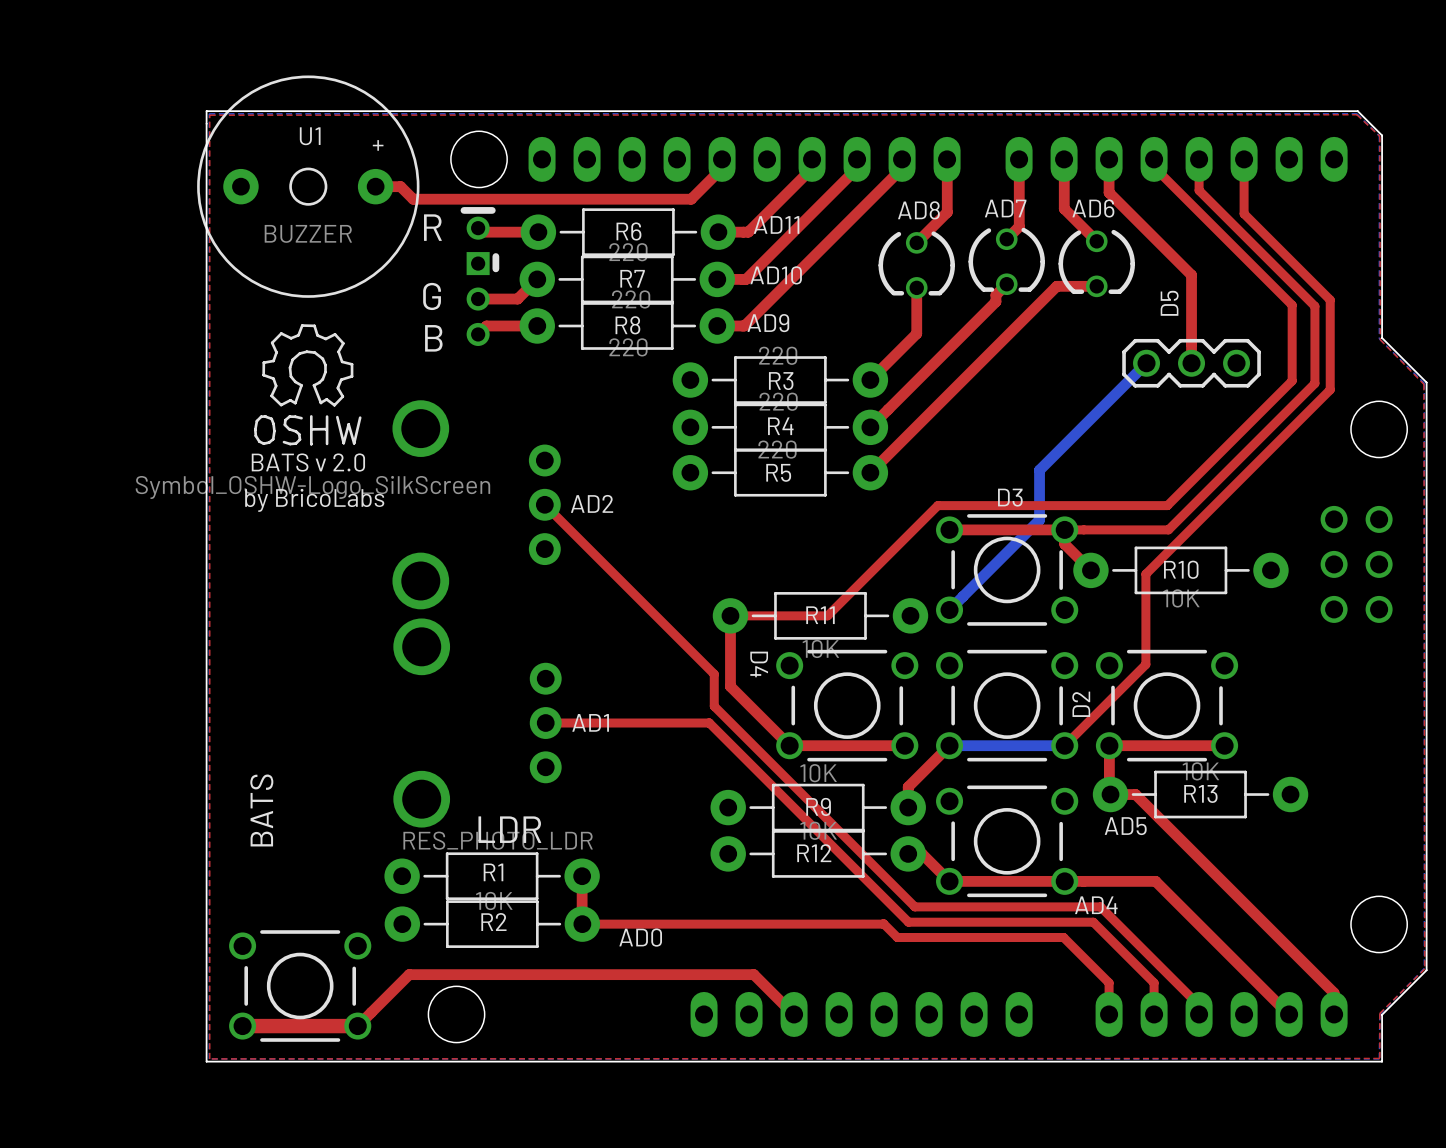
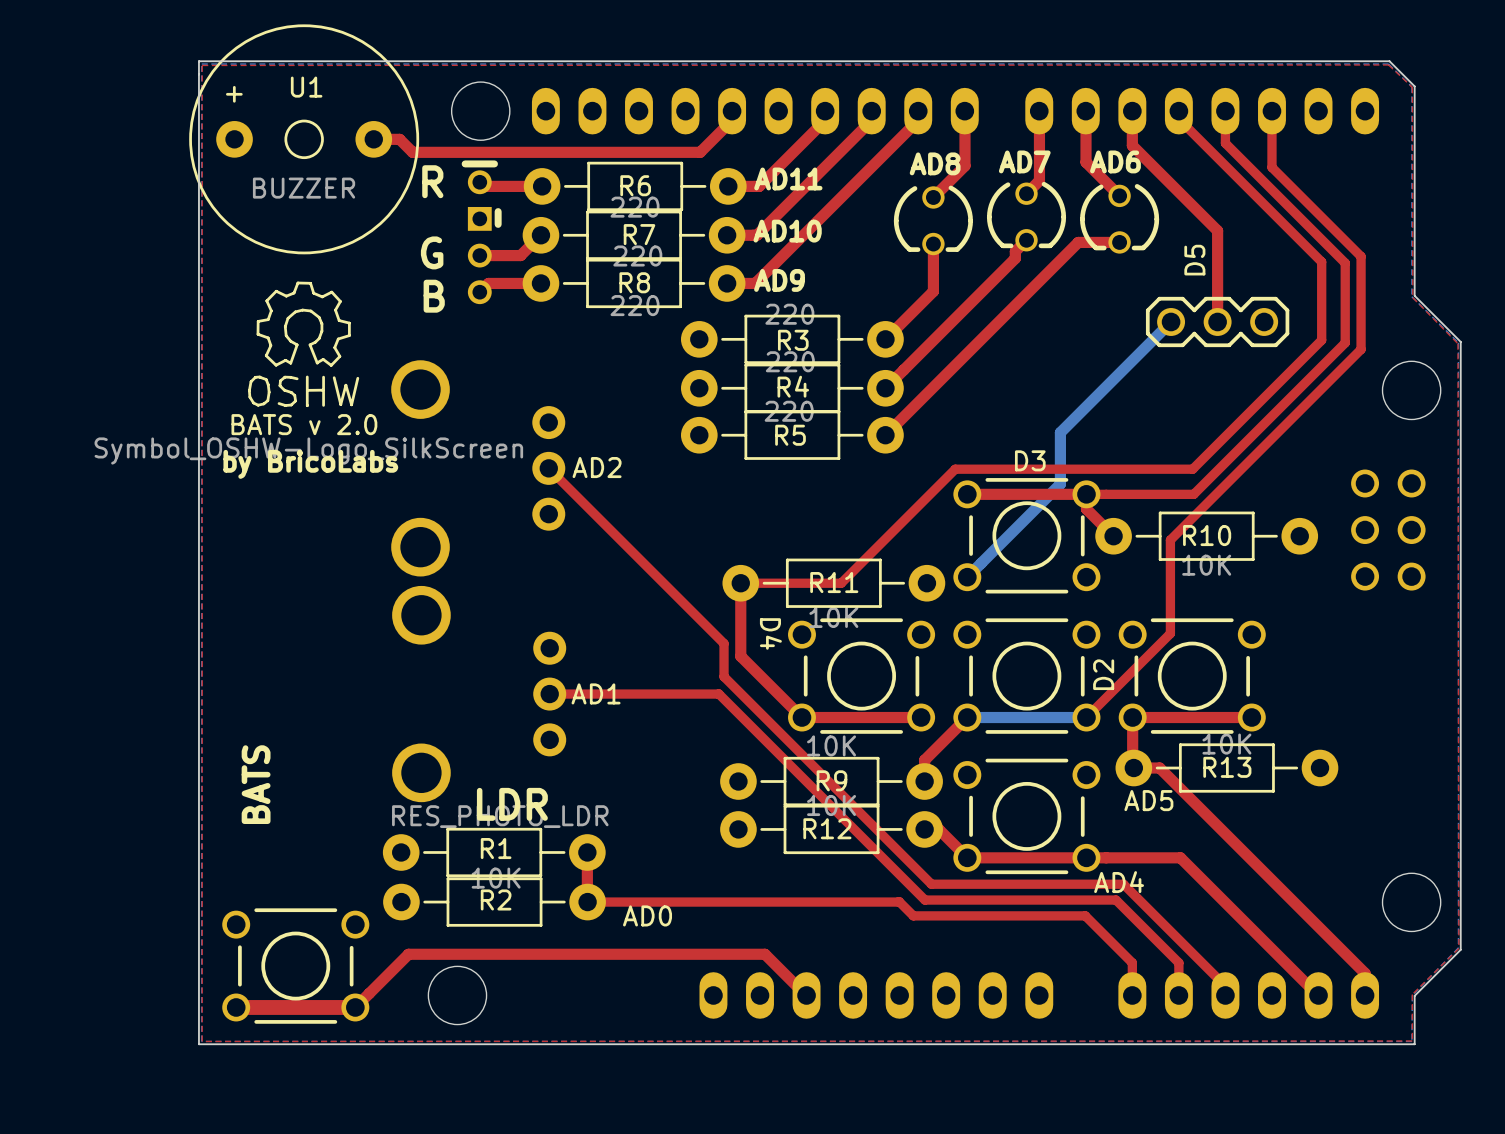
U1 text position: + (378, 145) -> + (234, 94)

